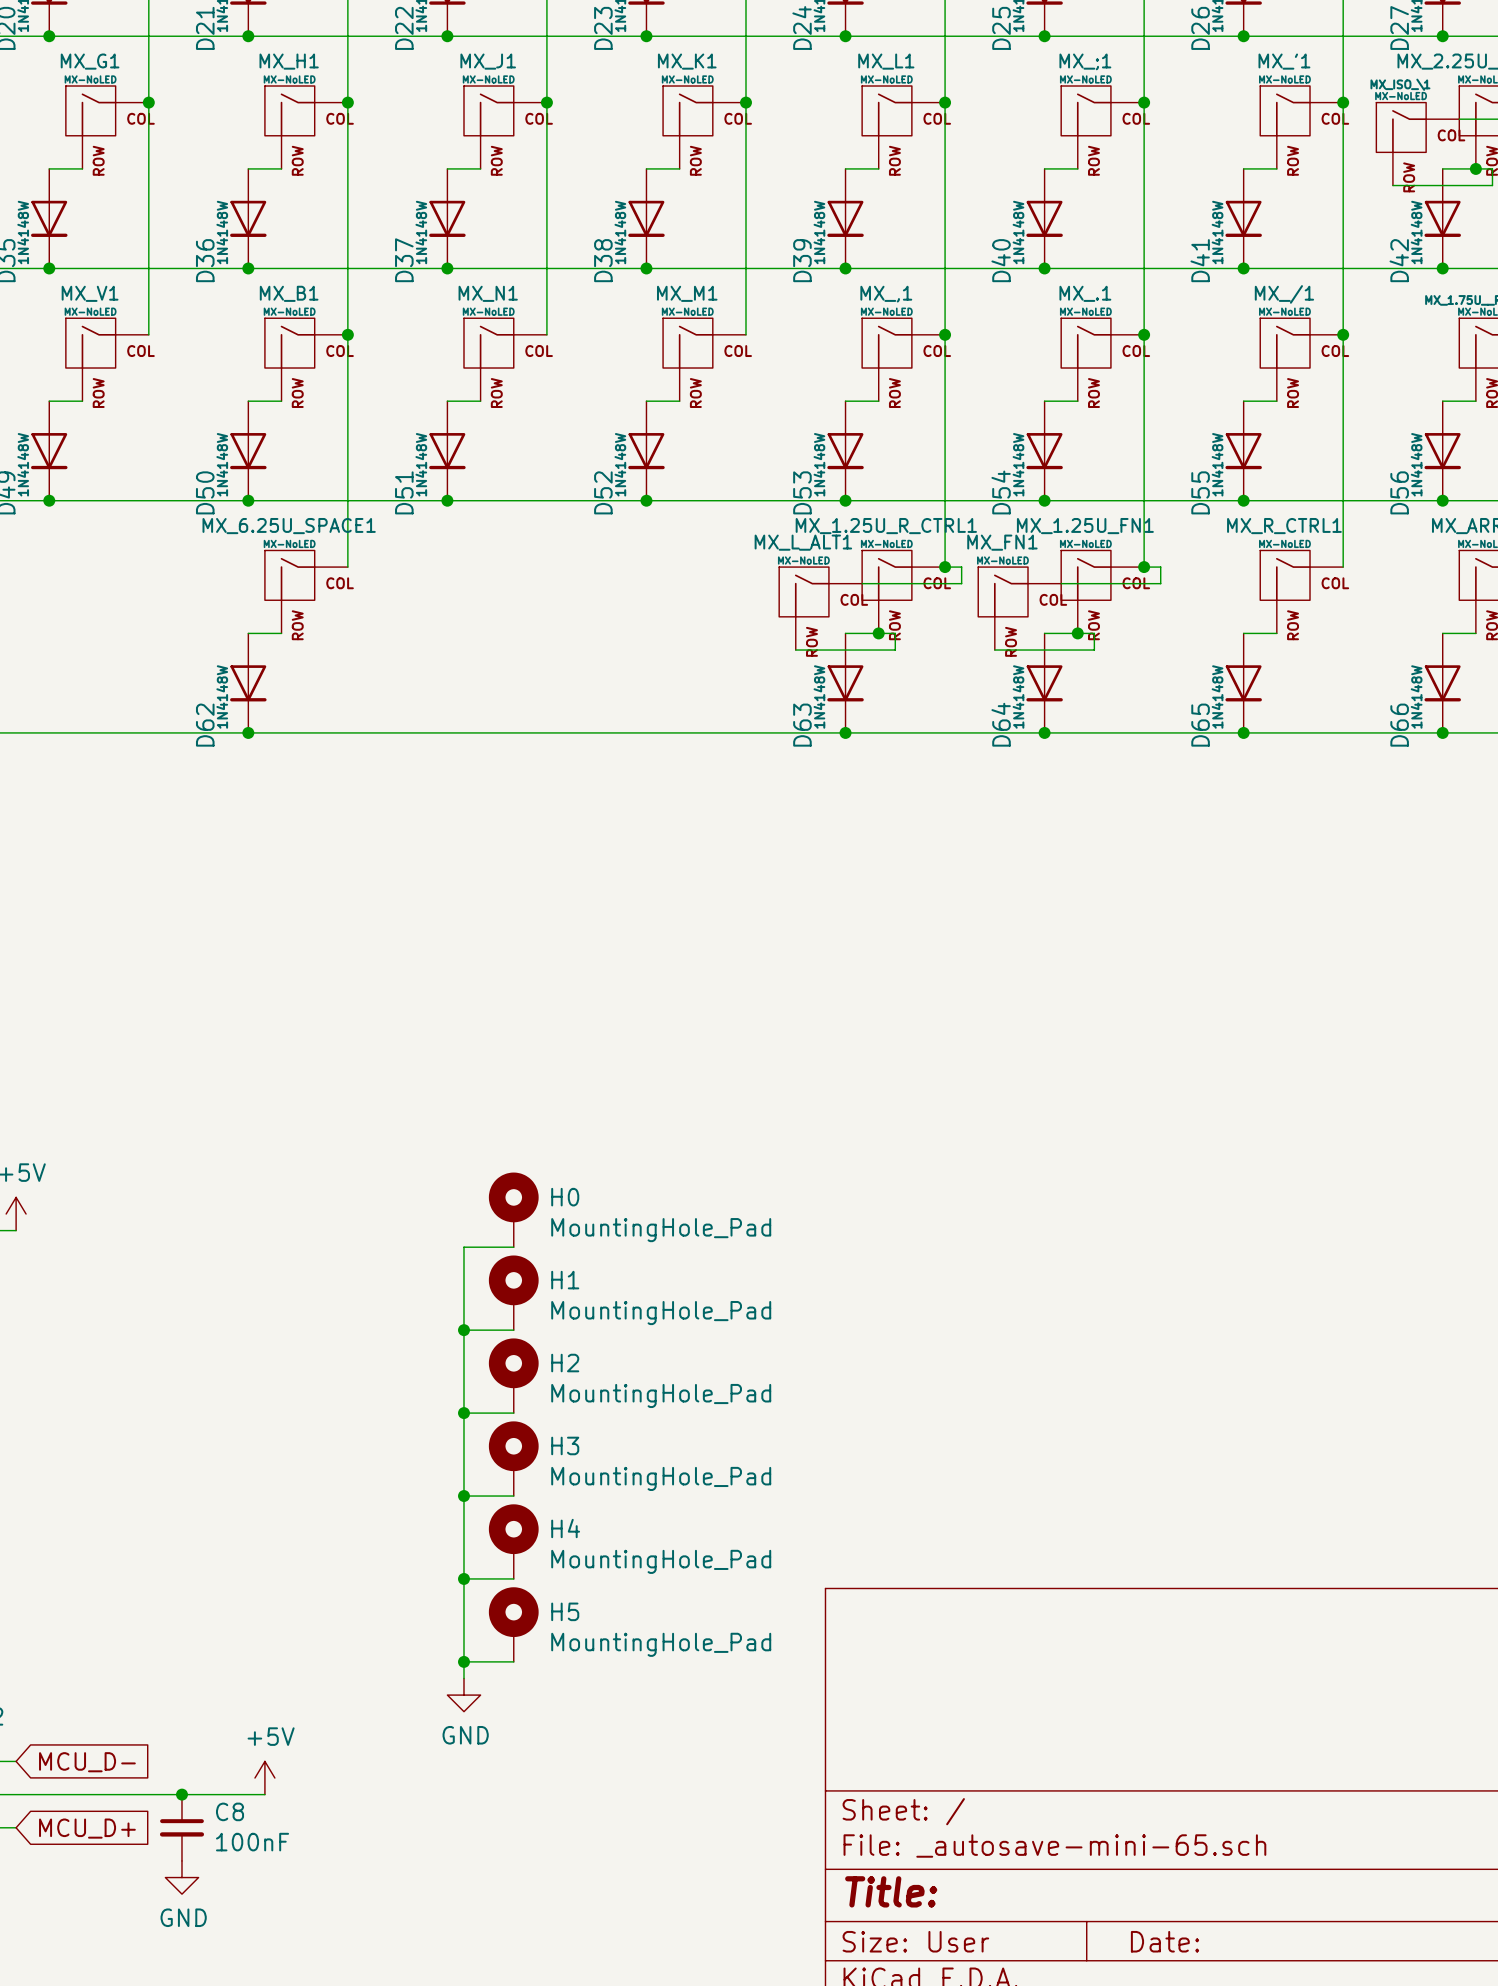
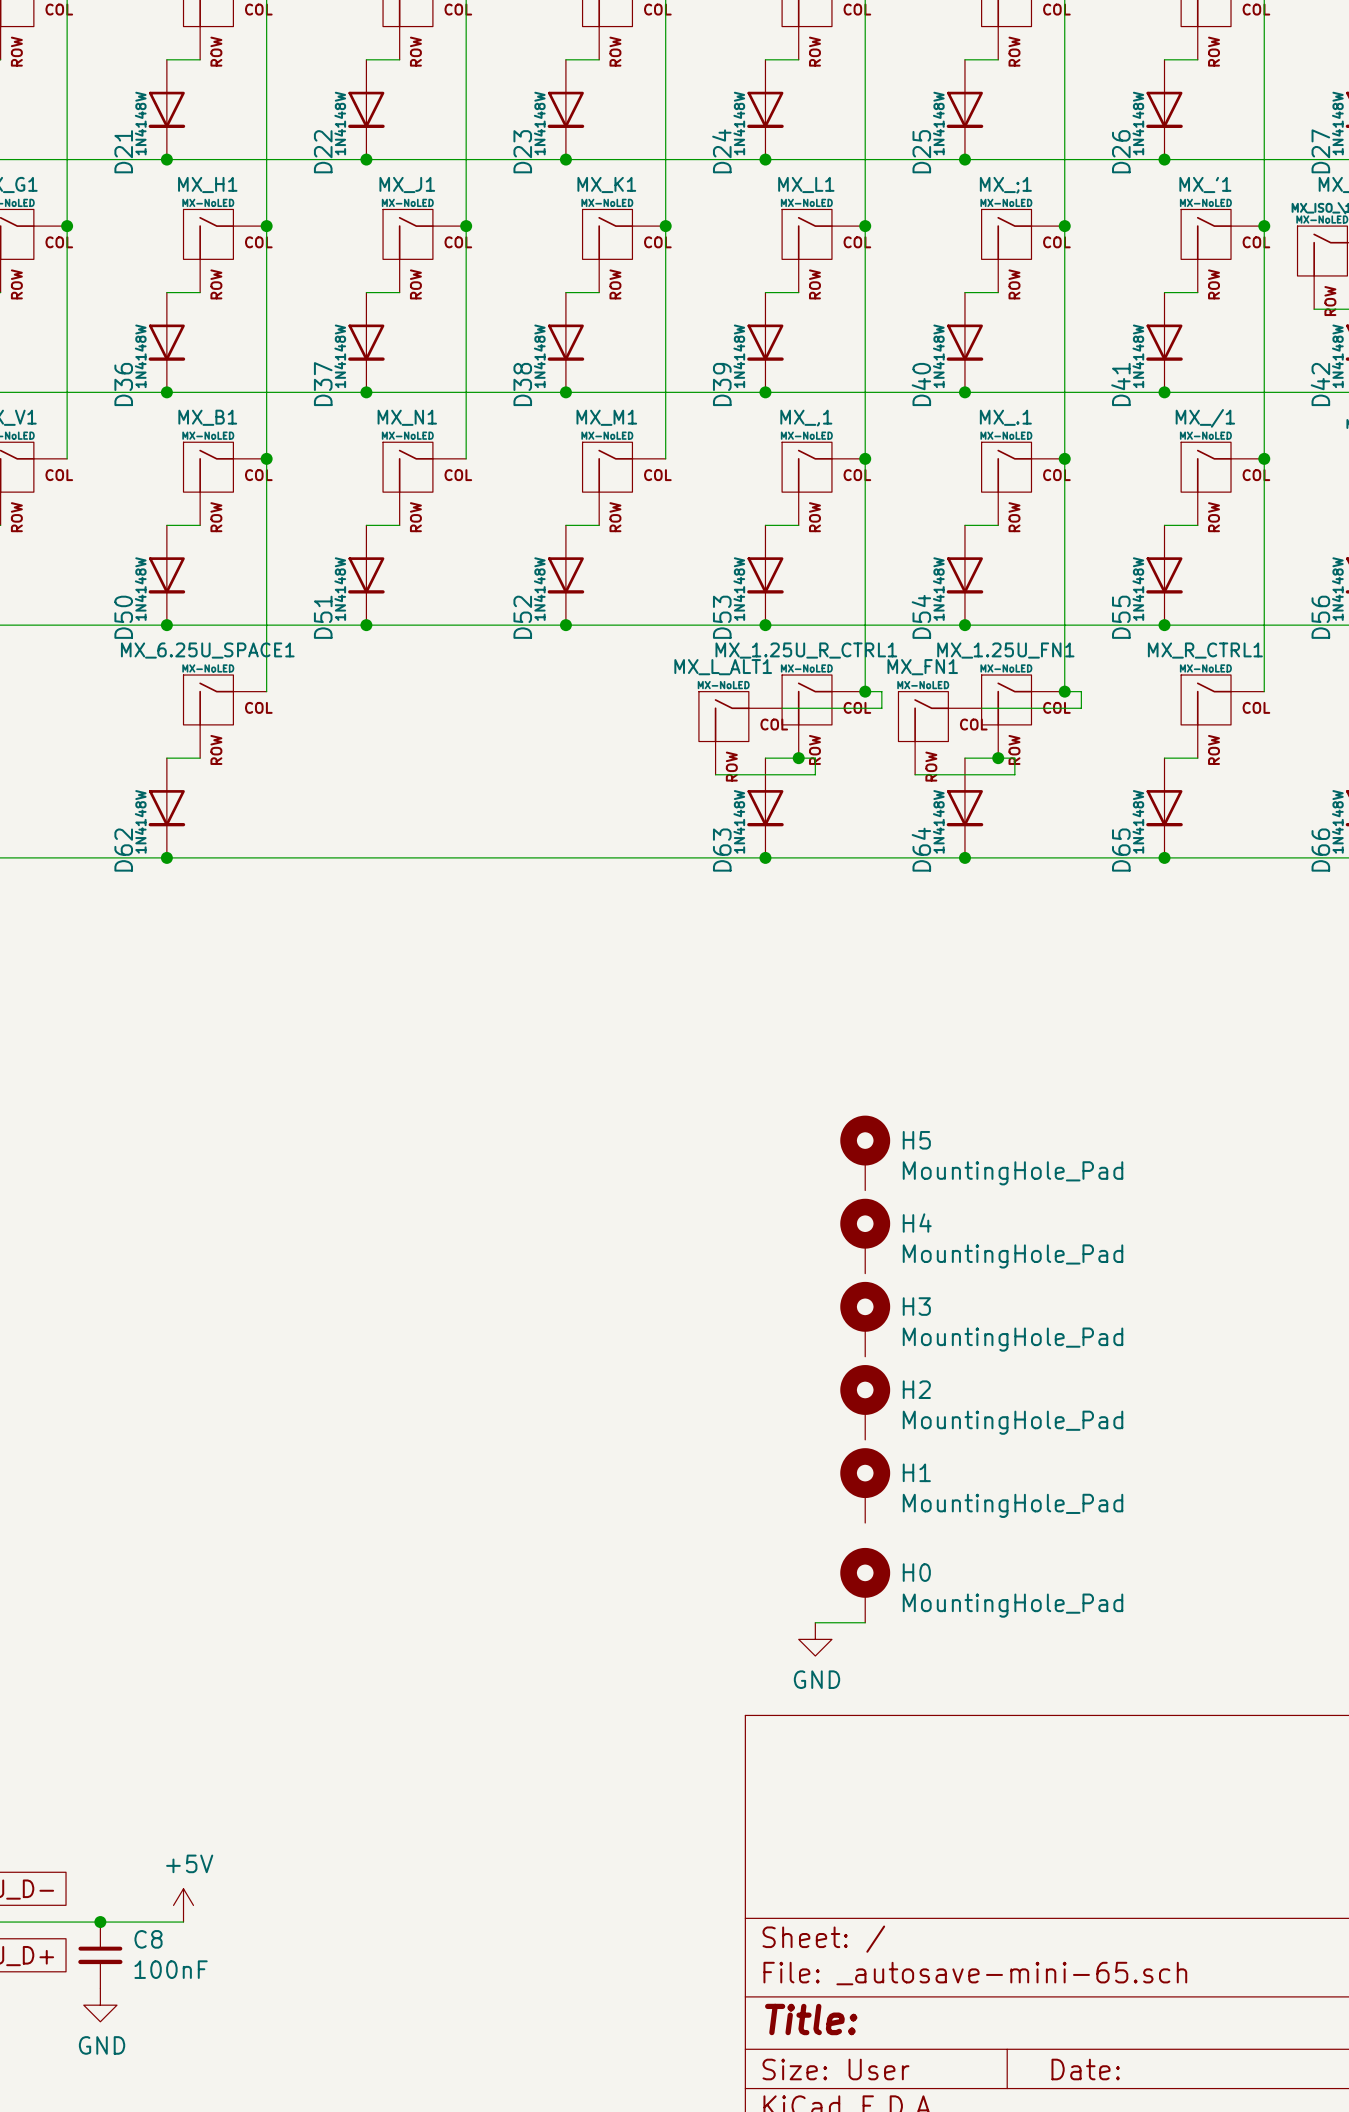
H0 position: (513, 1209) -> (865, 1585)
wire: (513, 1247) (463, 1247) (463, 1678) -> none
H1 position: (513, 1292) -> (865, 1485)
wire: (463, 1330) (513, 1330) -> none
junction: (463, 1330) -> none
H2 position: (513, 1375) -> (865, 1402)
wire: (463, 1413) (513, 1413) -> none
junction: (463, 1413) -> none
H3 position: (513, 1458) -> (865, 1319)
wire: (463, 1496) (513, 1496) -> none
junction: (463, 1496) -> none
wire: none -> (815, 1622) (865, 1622)
power symbol: none -> GND (815, 1639)
H4 position: (513, 1541) -> (865, 1236)
wire: (463, 1578) (513, 1578) -> none
junction: (463, 1578) -> none
H5 position: (513, 1624) -> (865, 1153)
wire: (463, 1661) (513, 1661) -> none
junction: (463, 1661) -> none
power symbol: GND (463, 1695) -> none

